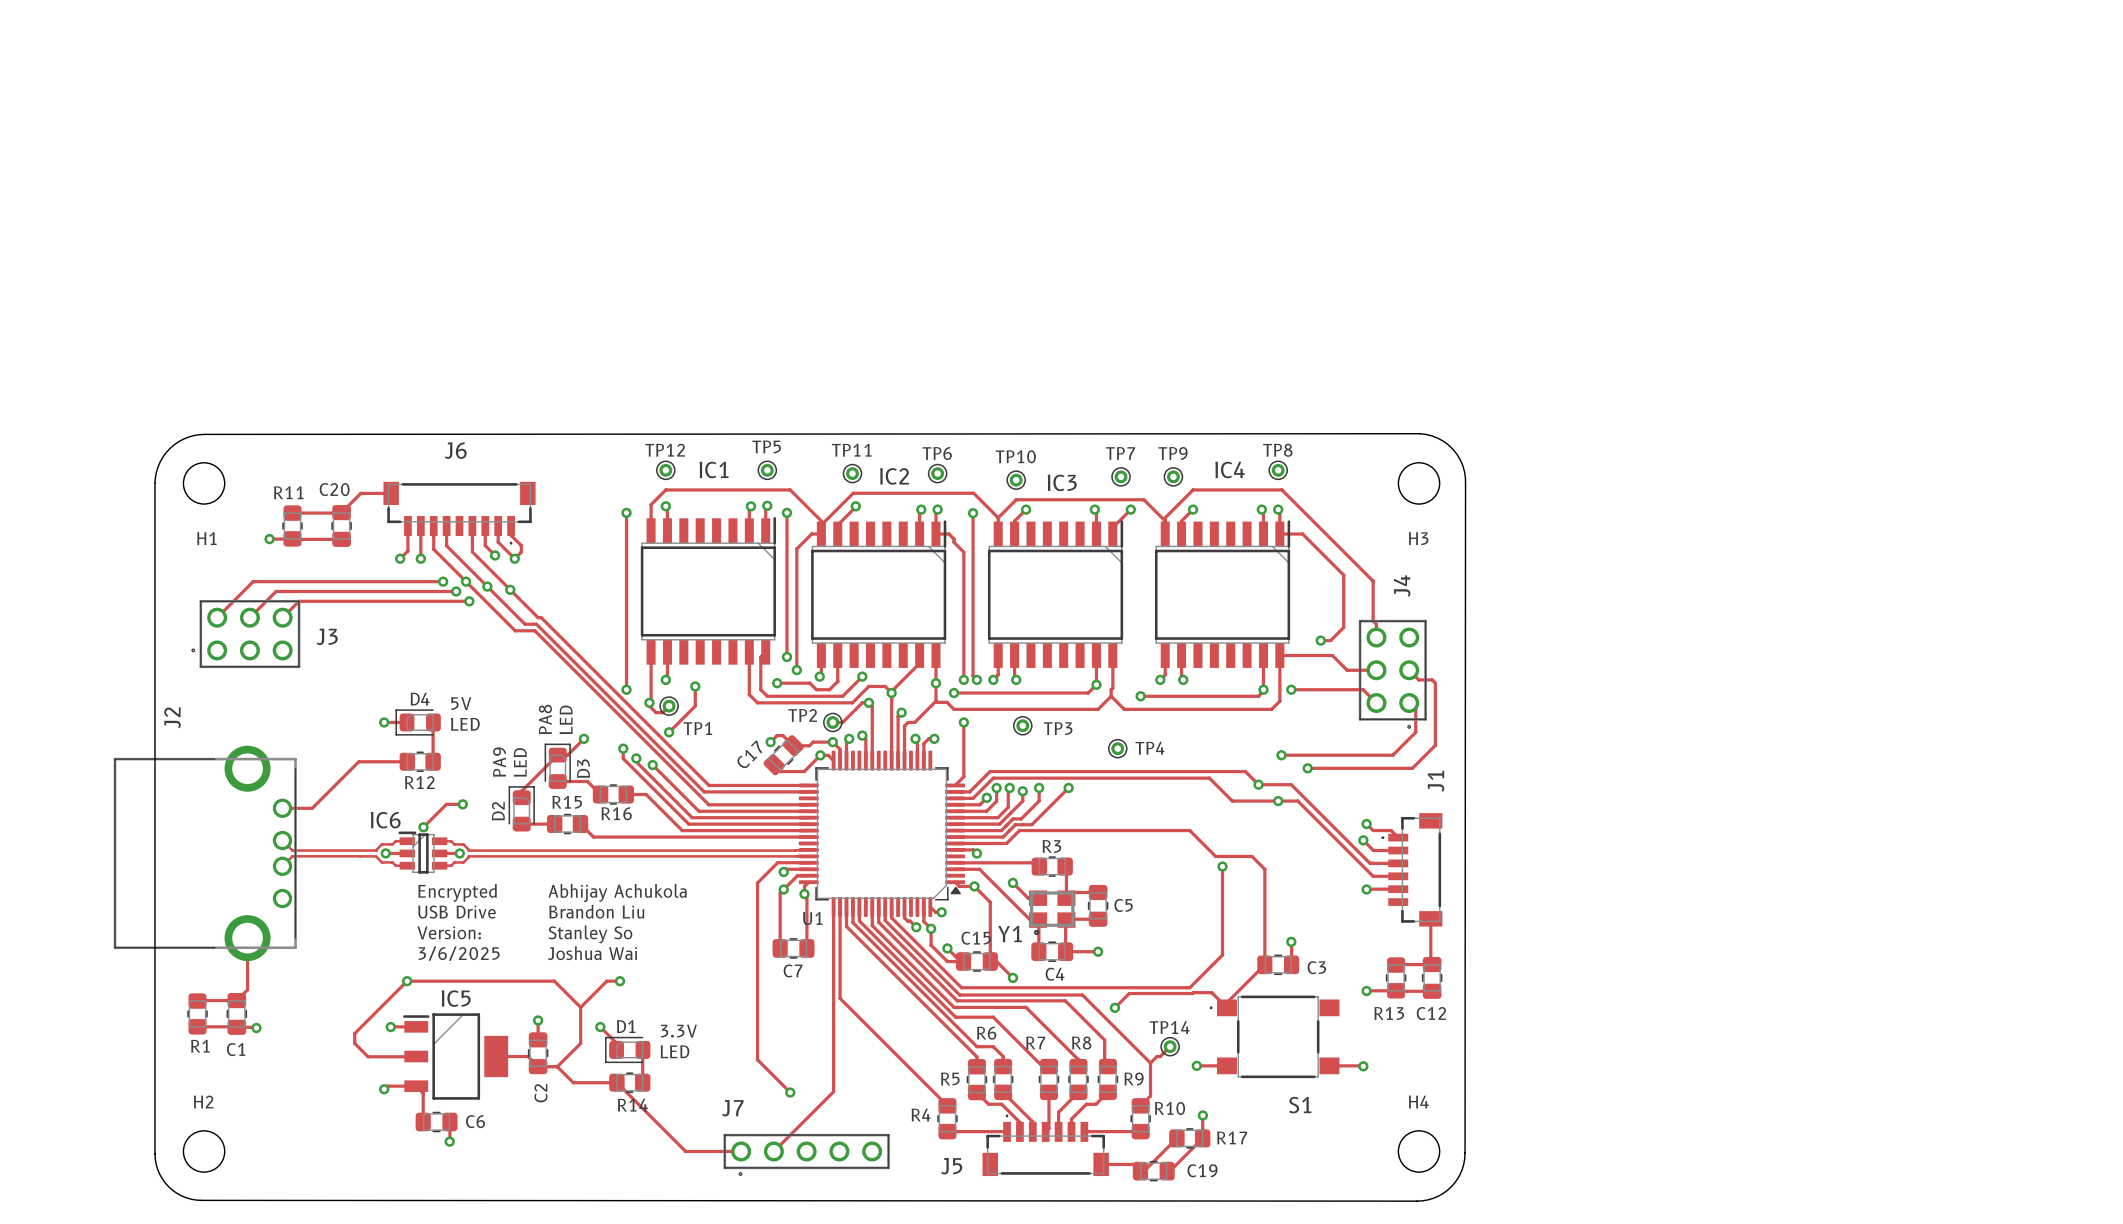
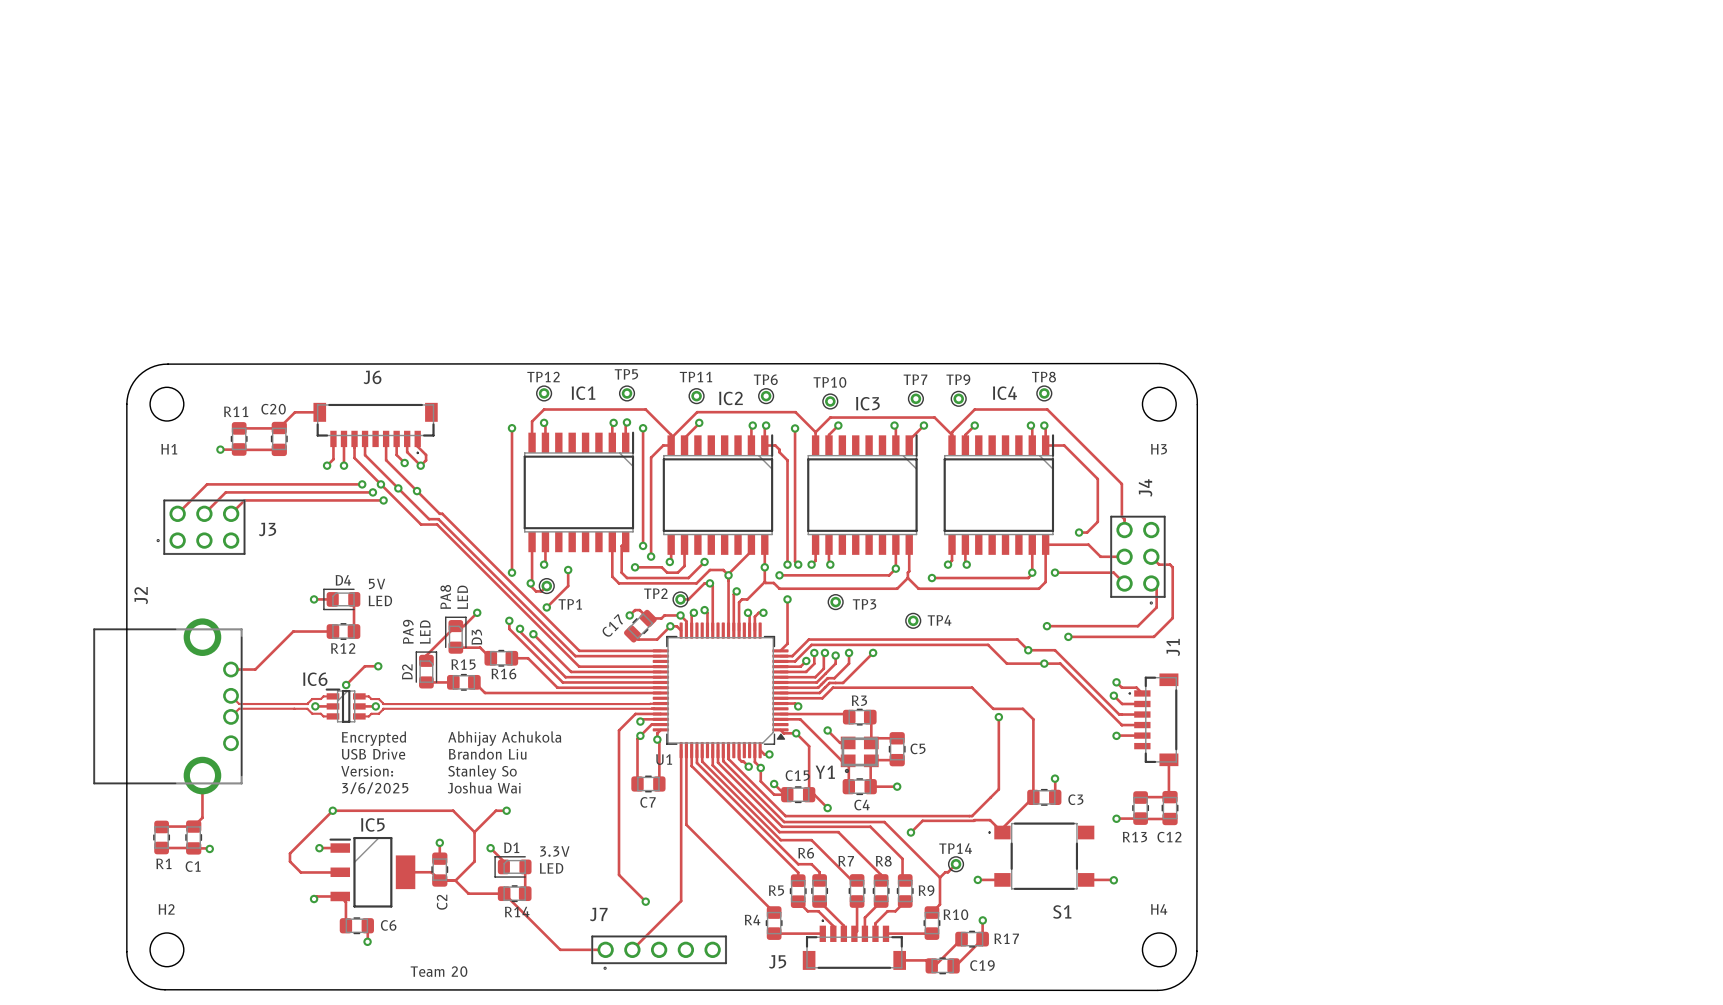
text: none -> Team 20 (439, 971)

